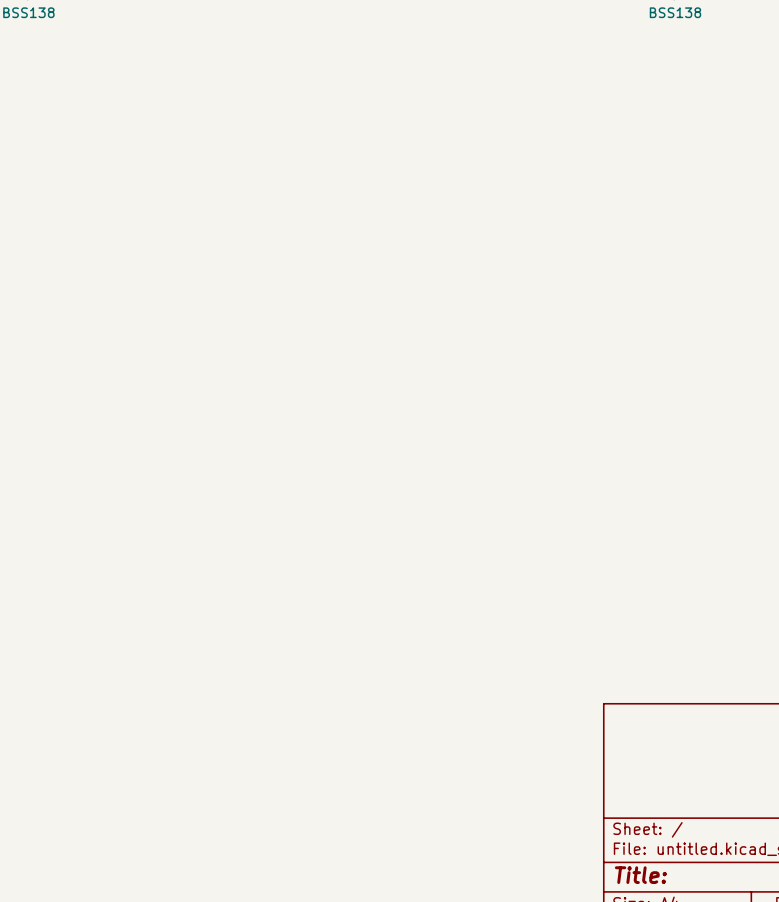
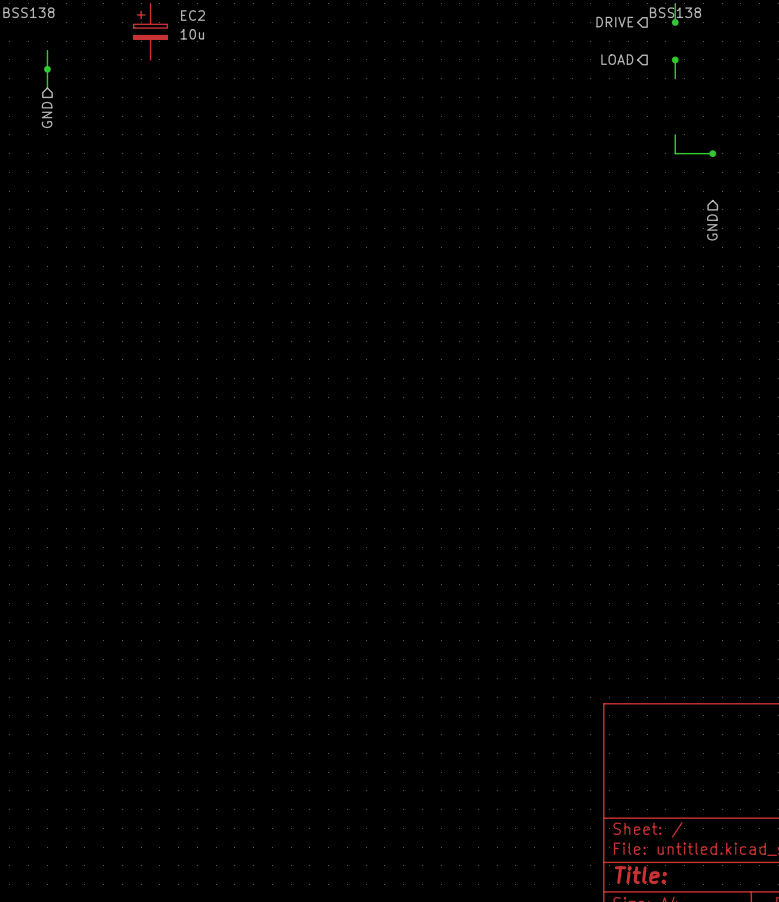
wire: none -> (675, 3) (675, 22)
hierarchical label: none -> DRIVE (614, 22)
junction: none -> (675, 22)
EC2: none -> 10u (150, 31)
wire: none -> (47, 50) (47, 88)
hierarchical label: none -> LOAD (617, 59)
wire: none -> (675, 59) (675, 78)
junction: none -> (675, 59)
junction: none -> (47, 69)
hierarchical label: none -> GND (47, 114)
wire: none -> (675, 134) (675, 153) (712, 153)
junction: none -> (712, 153)
hierarchical label: none -> GND (712, 227)

